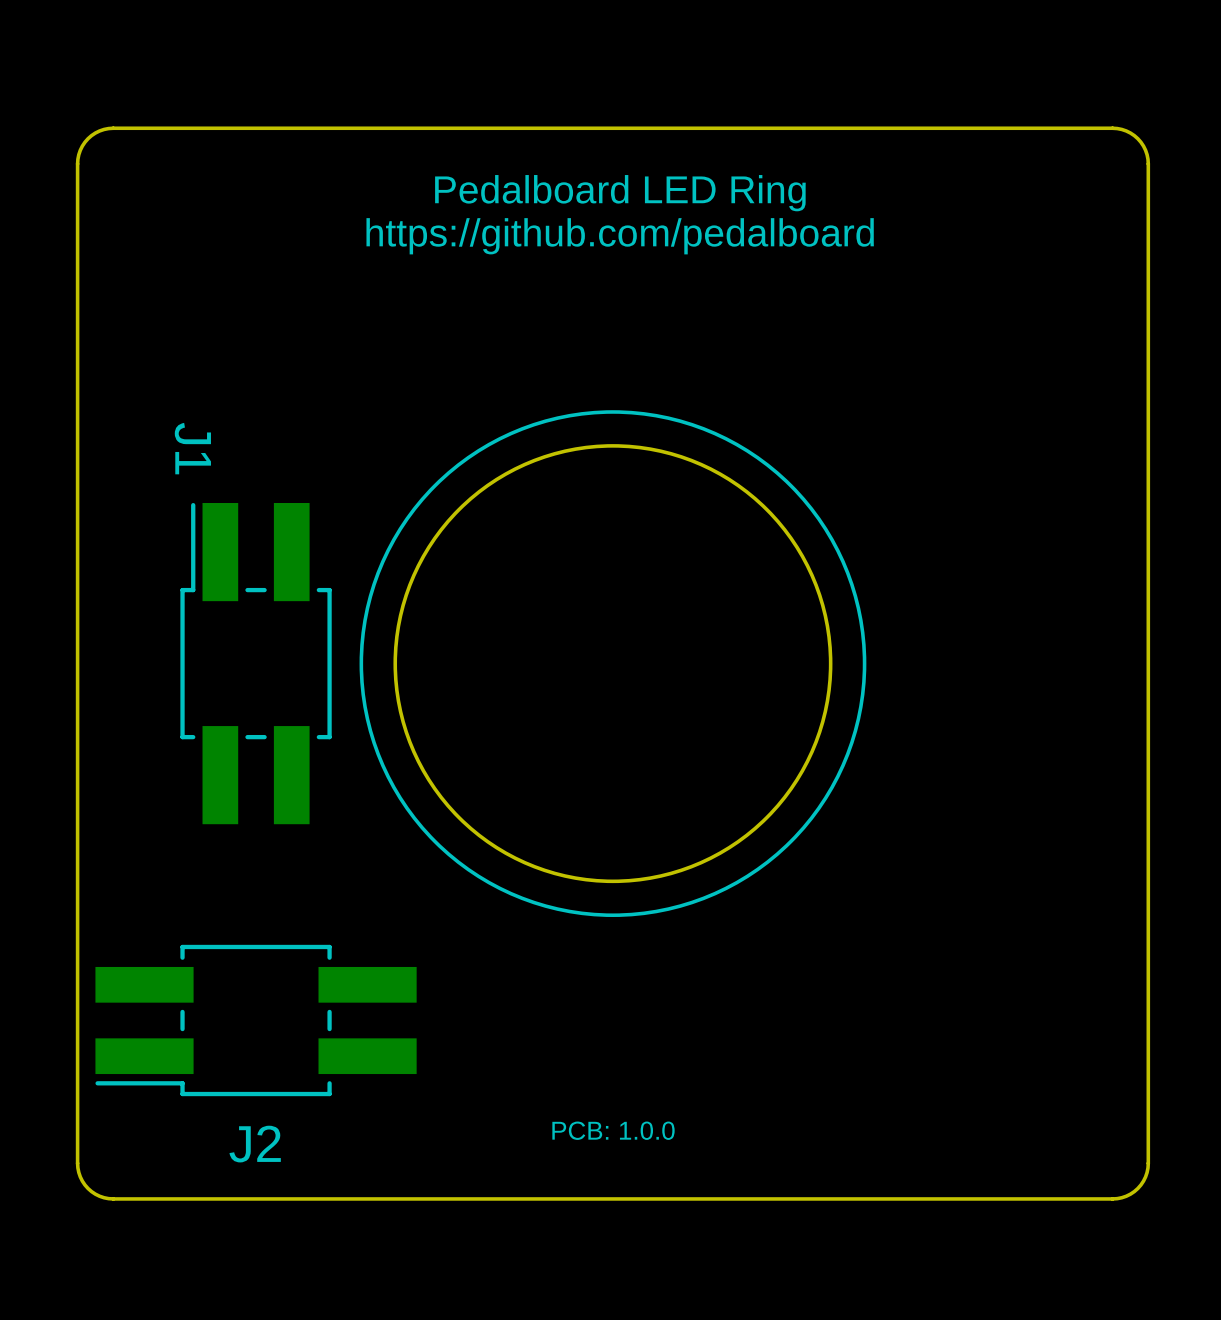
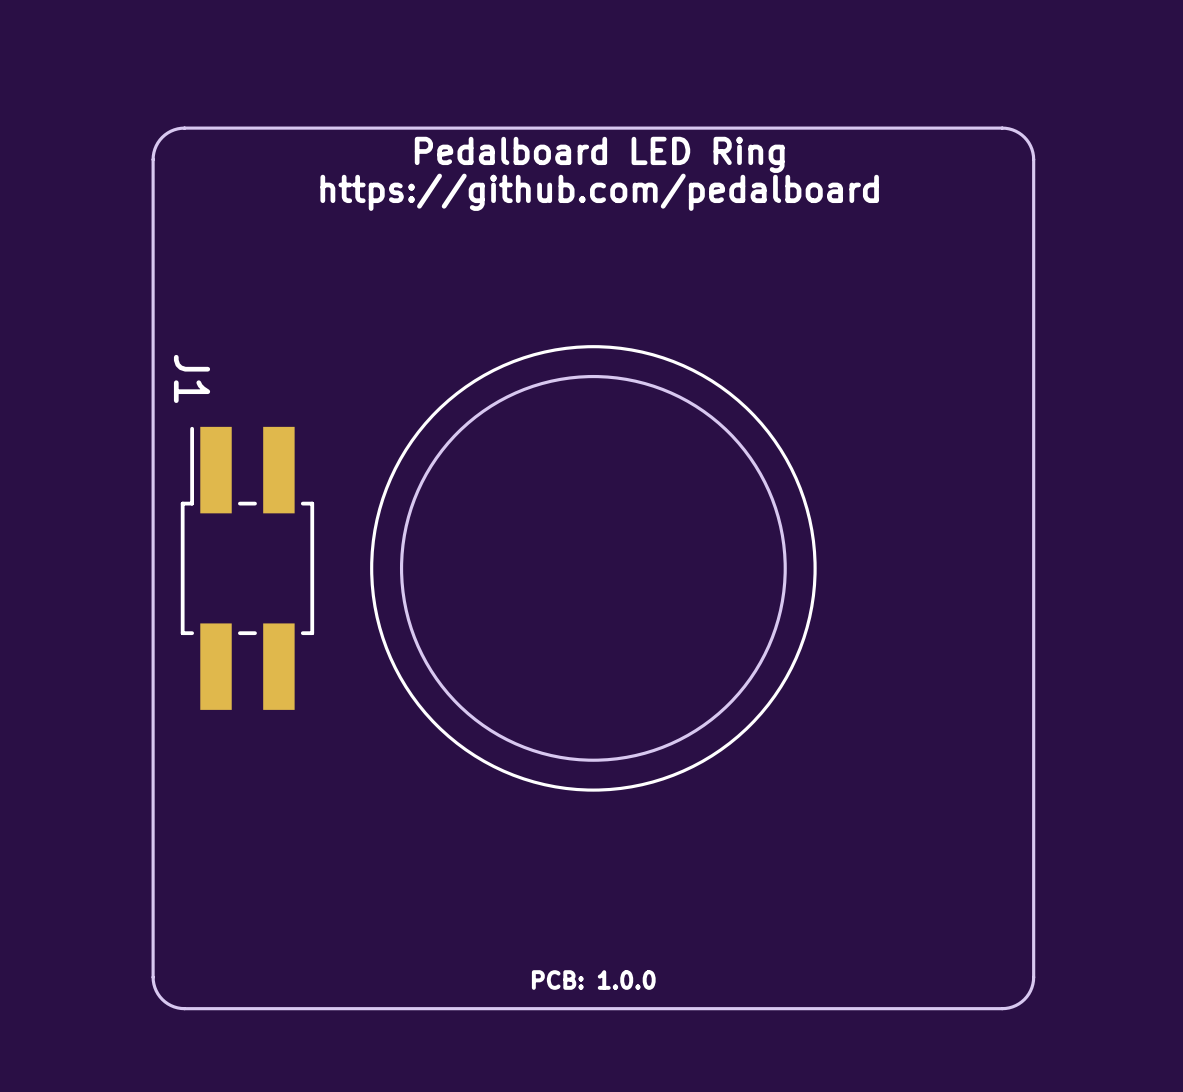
board edge: (1112, 128) (113, 128) (99, 130) (88, 138) (80, 150) (77, 163) (77, 1163) (80, 1176) (88, 1188) (99, 1196) (113, 1198) (1112, 1198) (1126, 1196) (1137, 1188) (1145, 1176) (1148, 1163) (1148, 163) (1145, 150) (1137, 138) (1126, 130) (1112, 128) -> (1002, 128) (1012, 129) (1024, 137) (1031, 149) (1033, 159) (1033, 977) (1030, 990) (1024, 999) (1015, 1005) (1002, 1008) (184, 1008) (174, 1006) (162, 999) (154, 987) (153, 977) (153, 159) (154, 149) (162, 137) (170, 131) (184, 128) (1002, 128)
J1 position: (256, 663) -> (247, 568)
J2: (256, 1020) -> none

